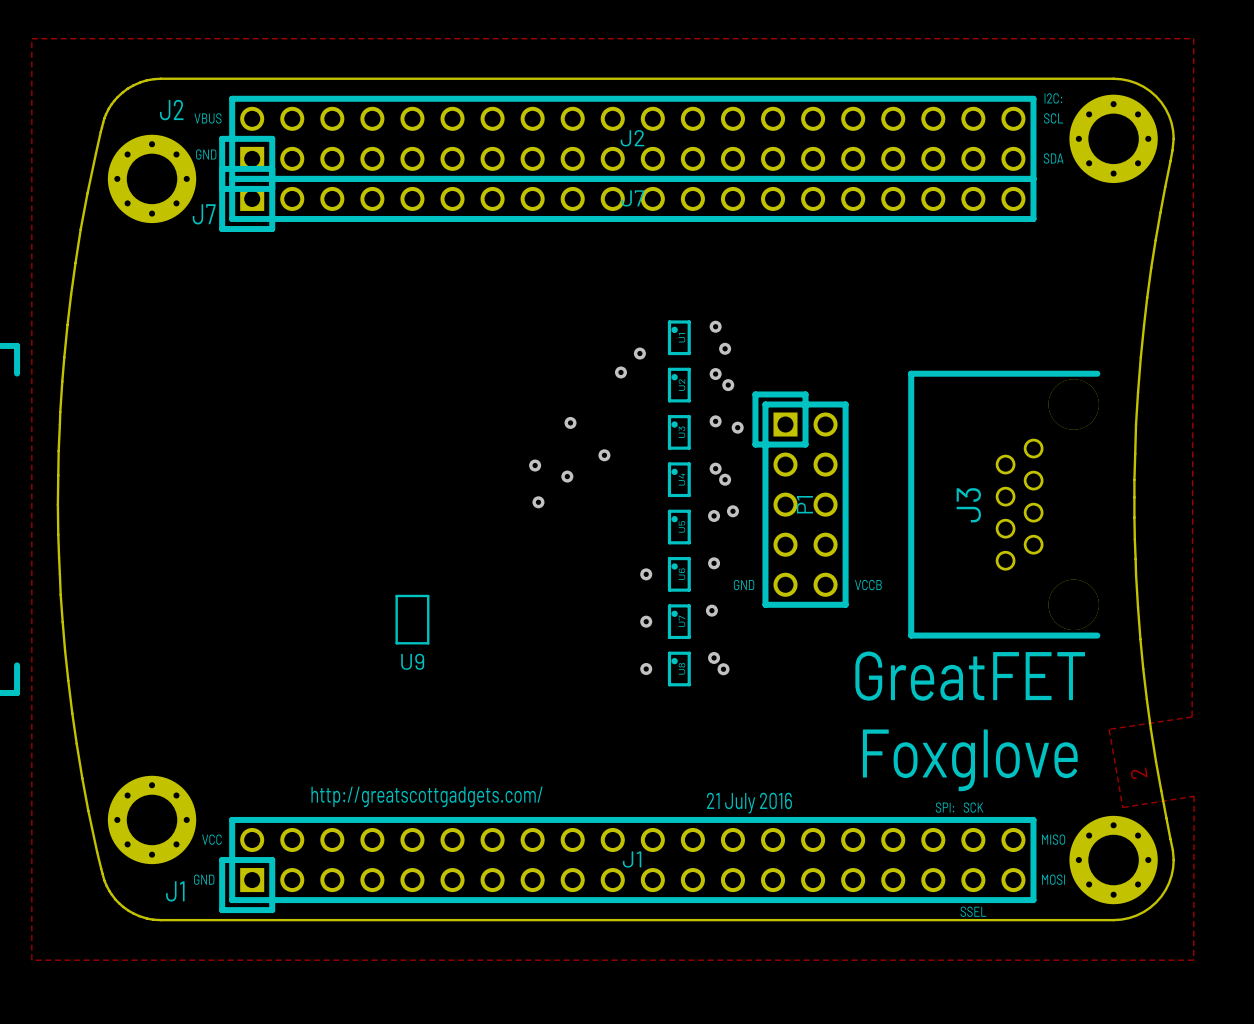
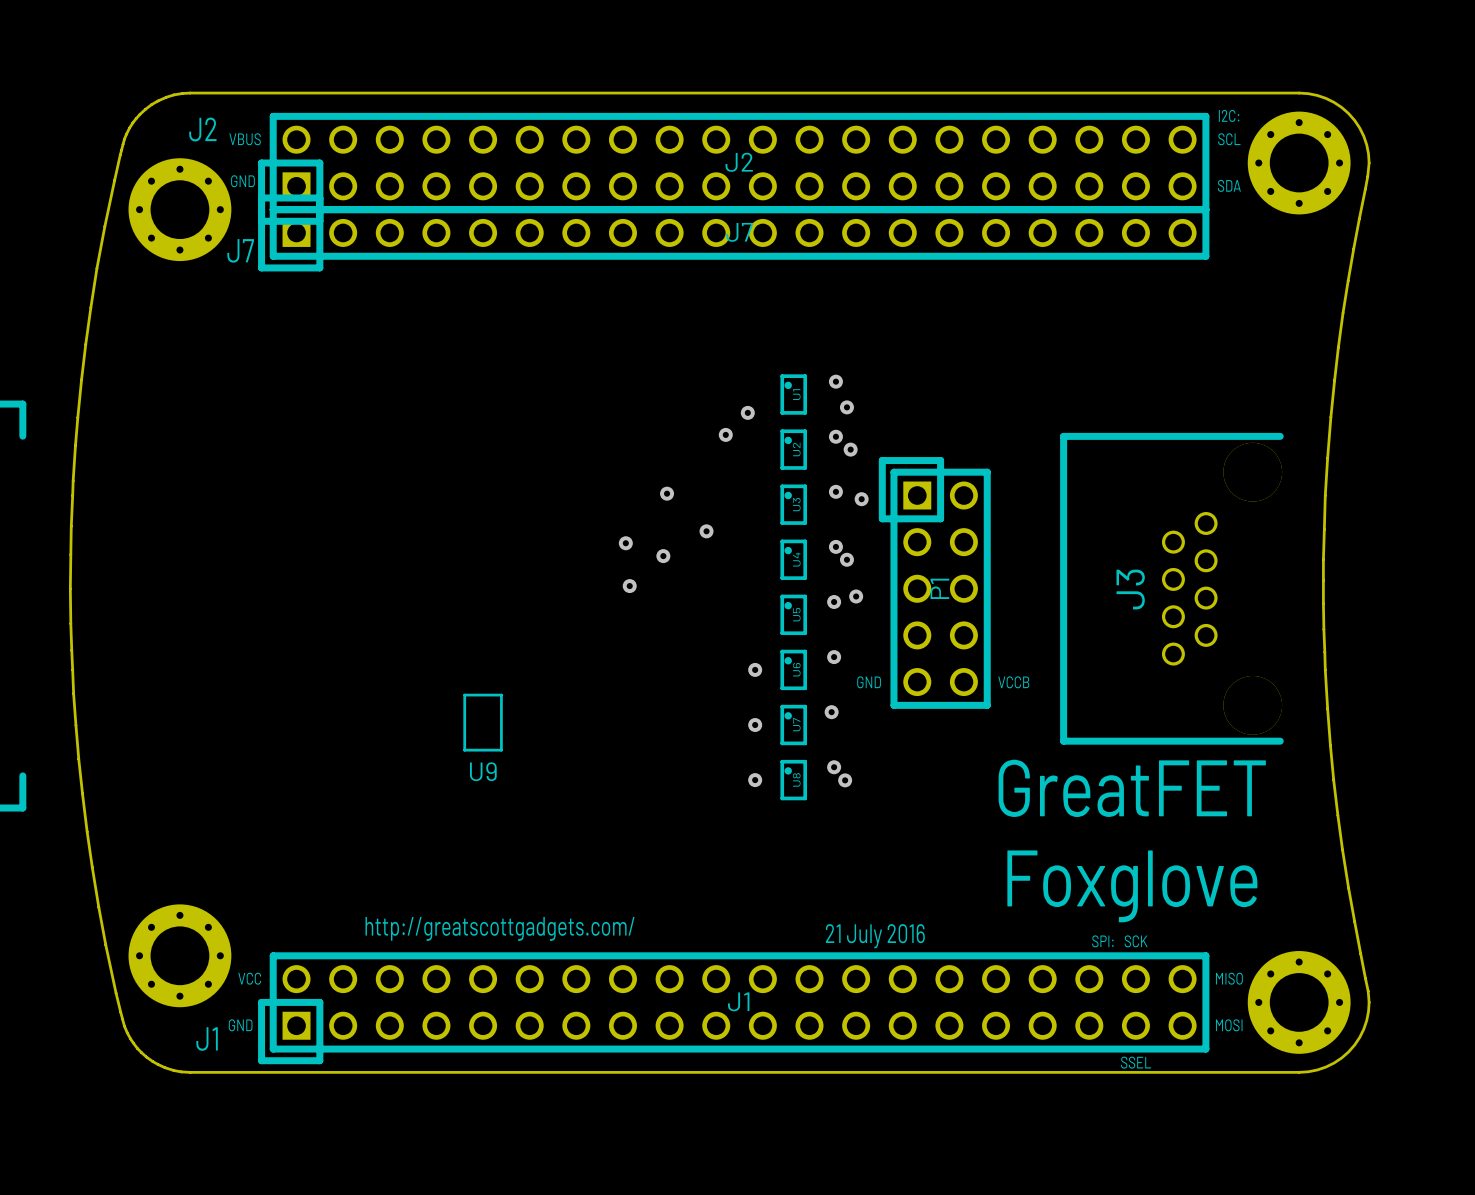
zone outline: (31, 38) (1193, 38) (1192, 716) (1109, 729) (1122, 807) (1194, 796) (1193, 960) (31, 960) (31, 38) -> none
text: 2 (1139, 773) -> none

